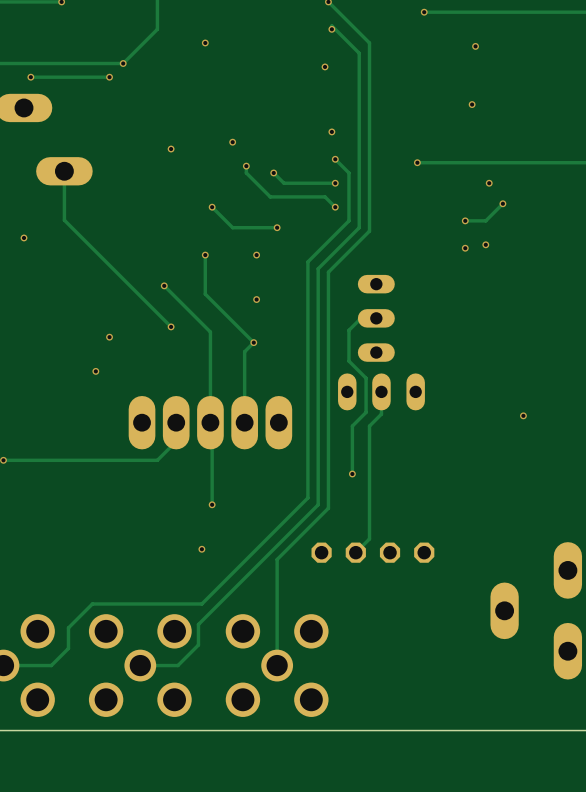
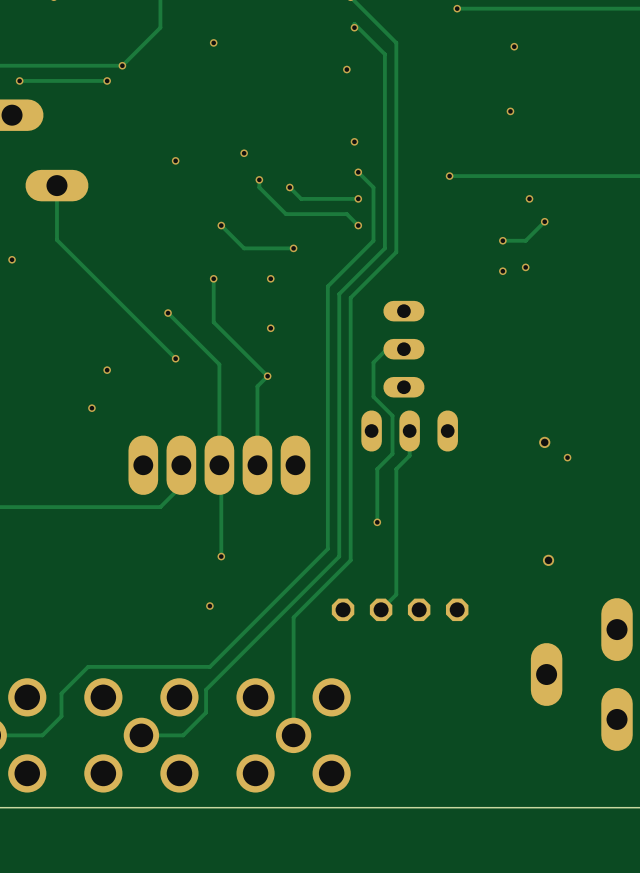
via: none -> (544, 442)
via: none -> (548, 560)

